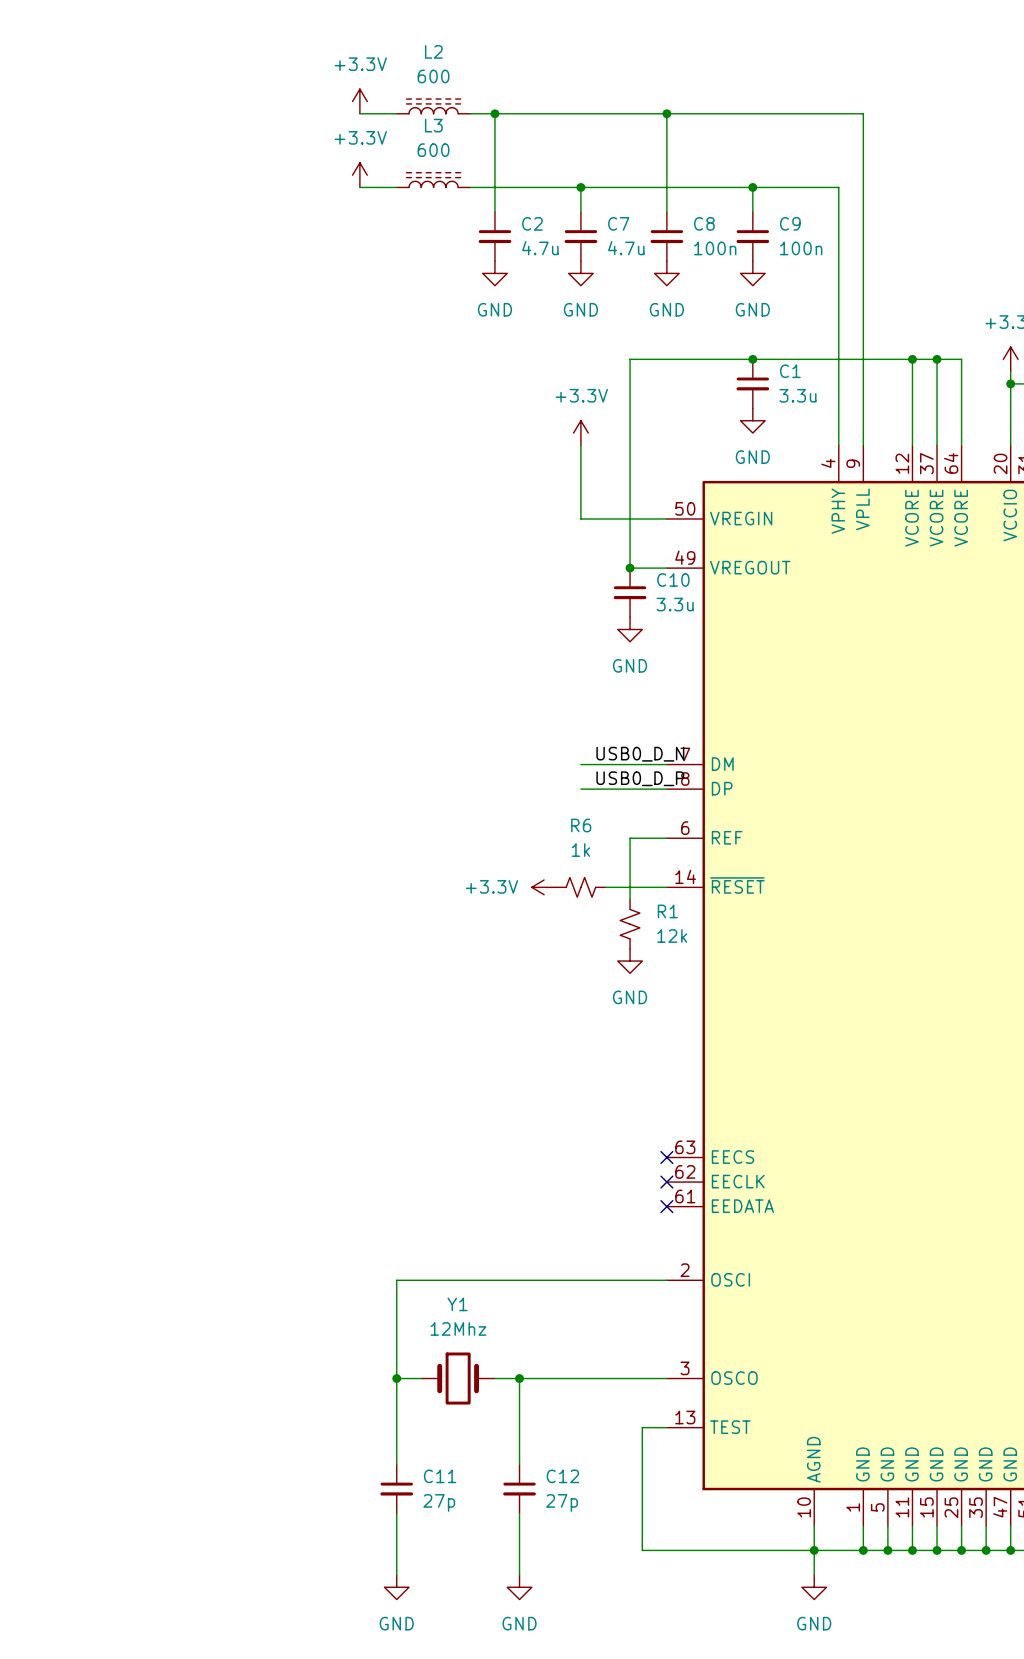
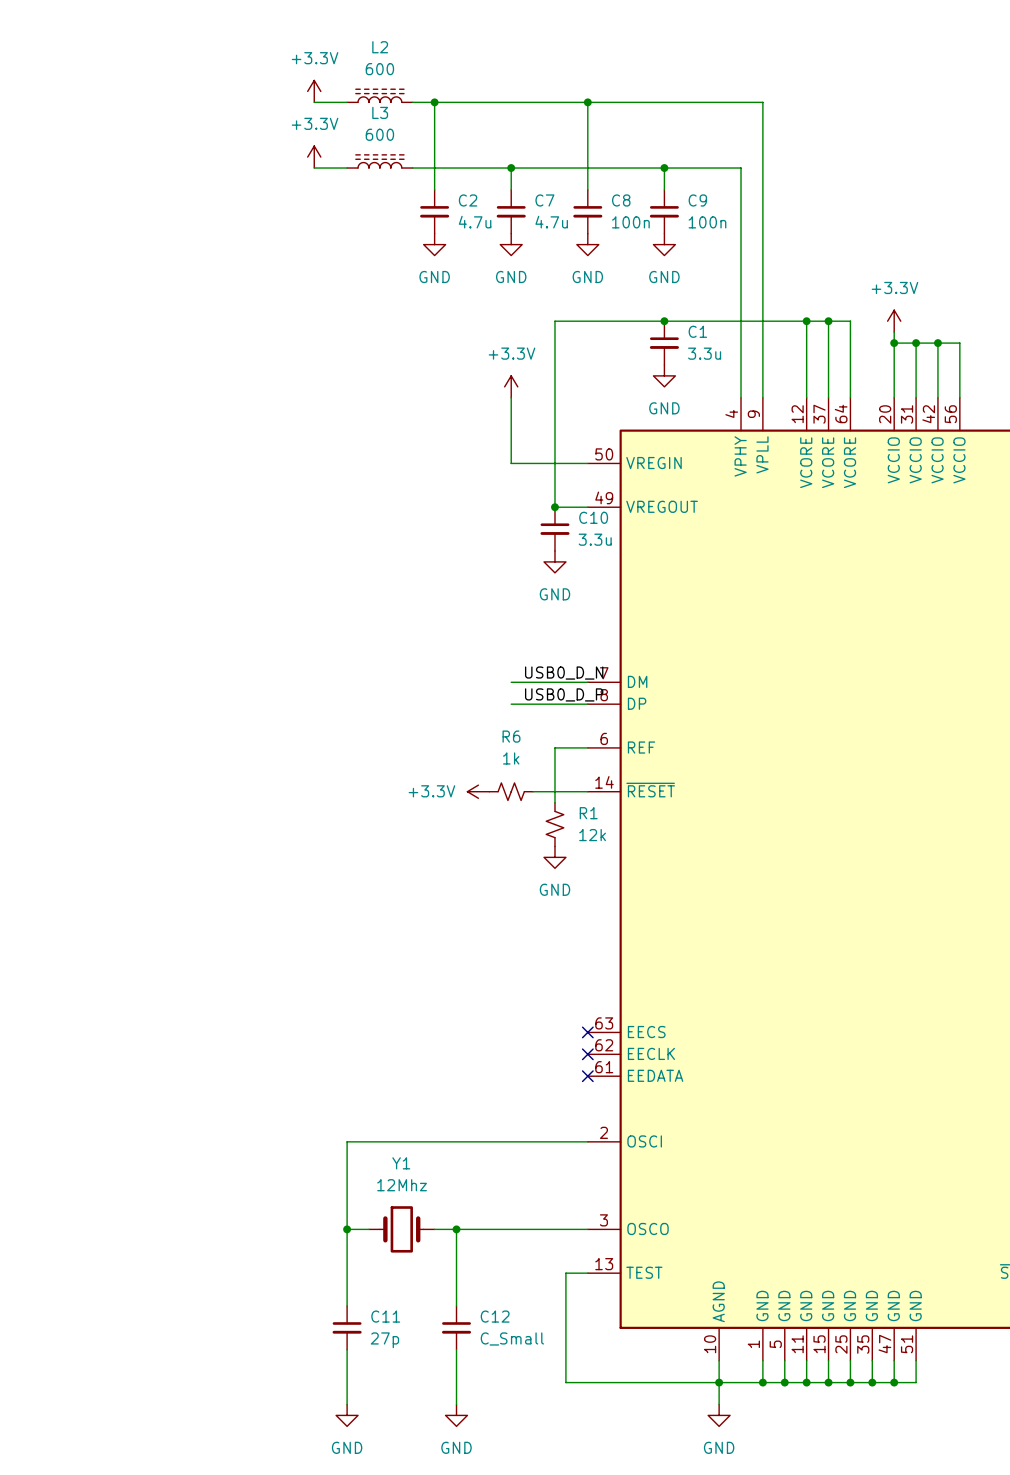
C12 value: 27p (562, 1502) -> C_Small (512, 1338)

